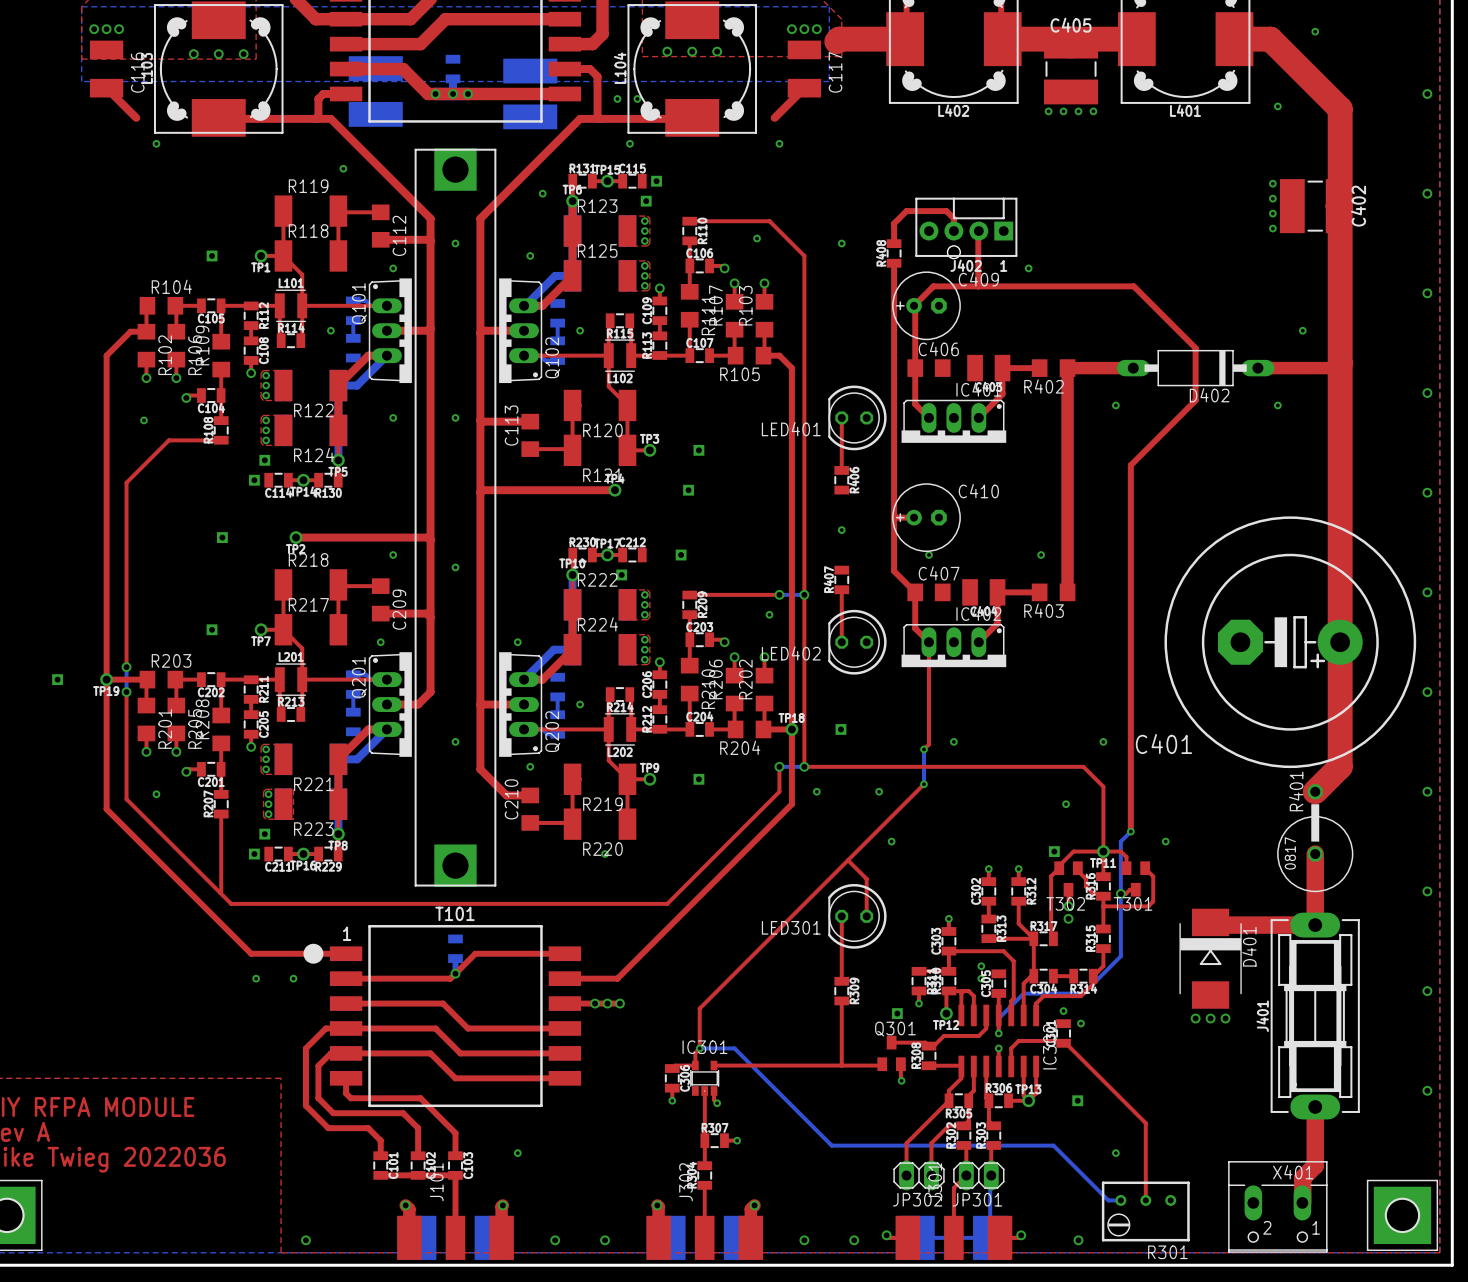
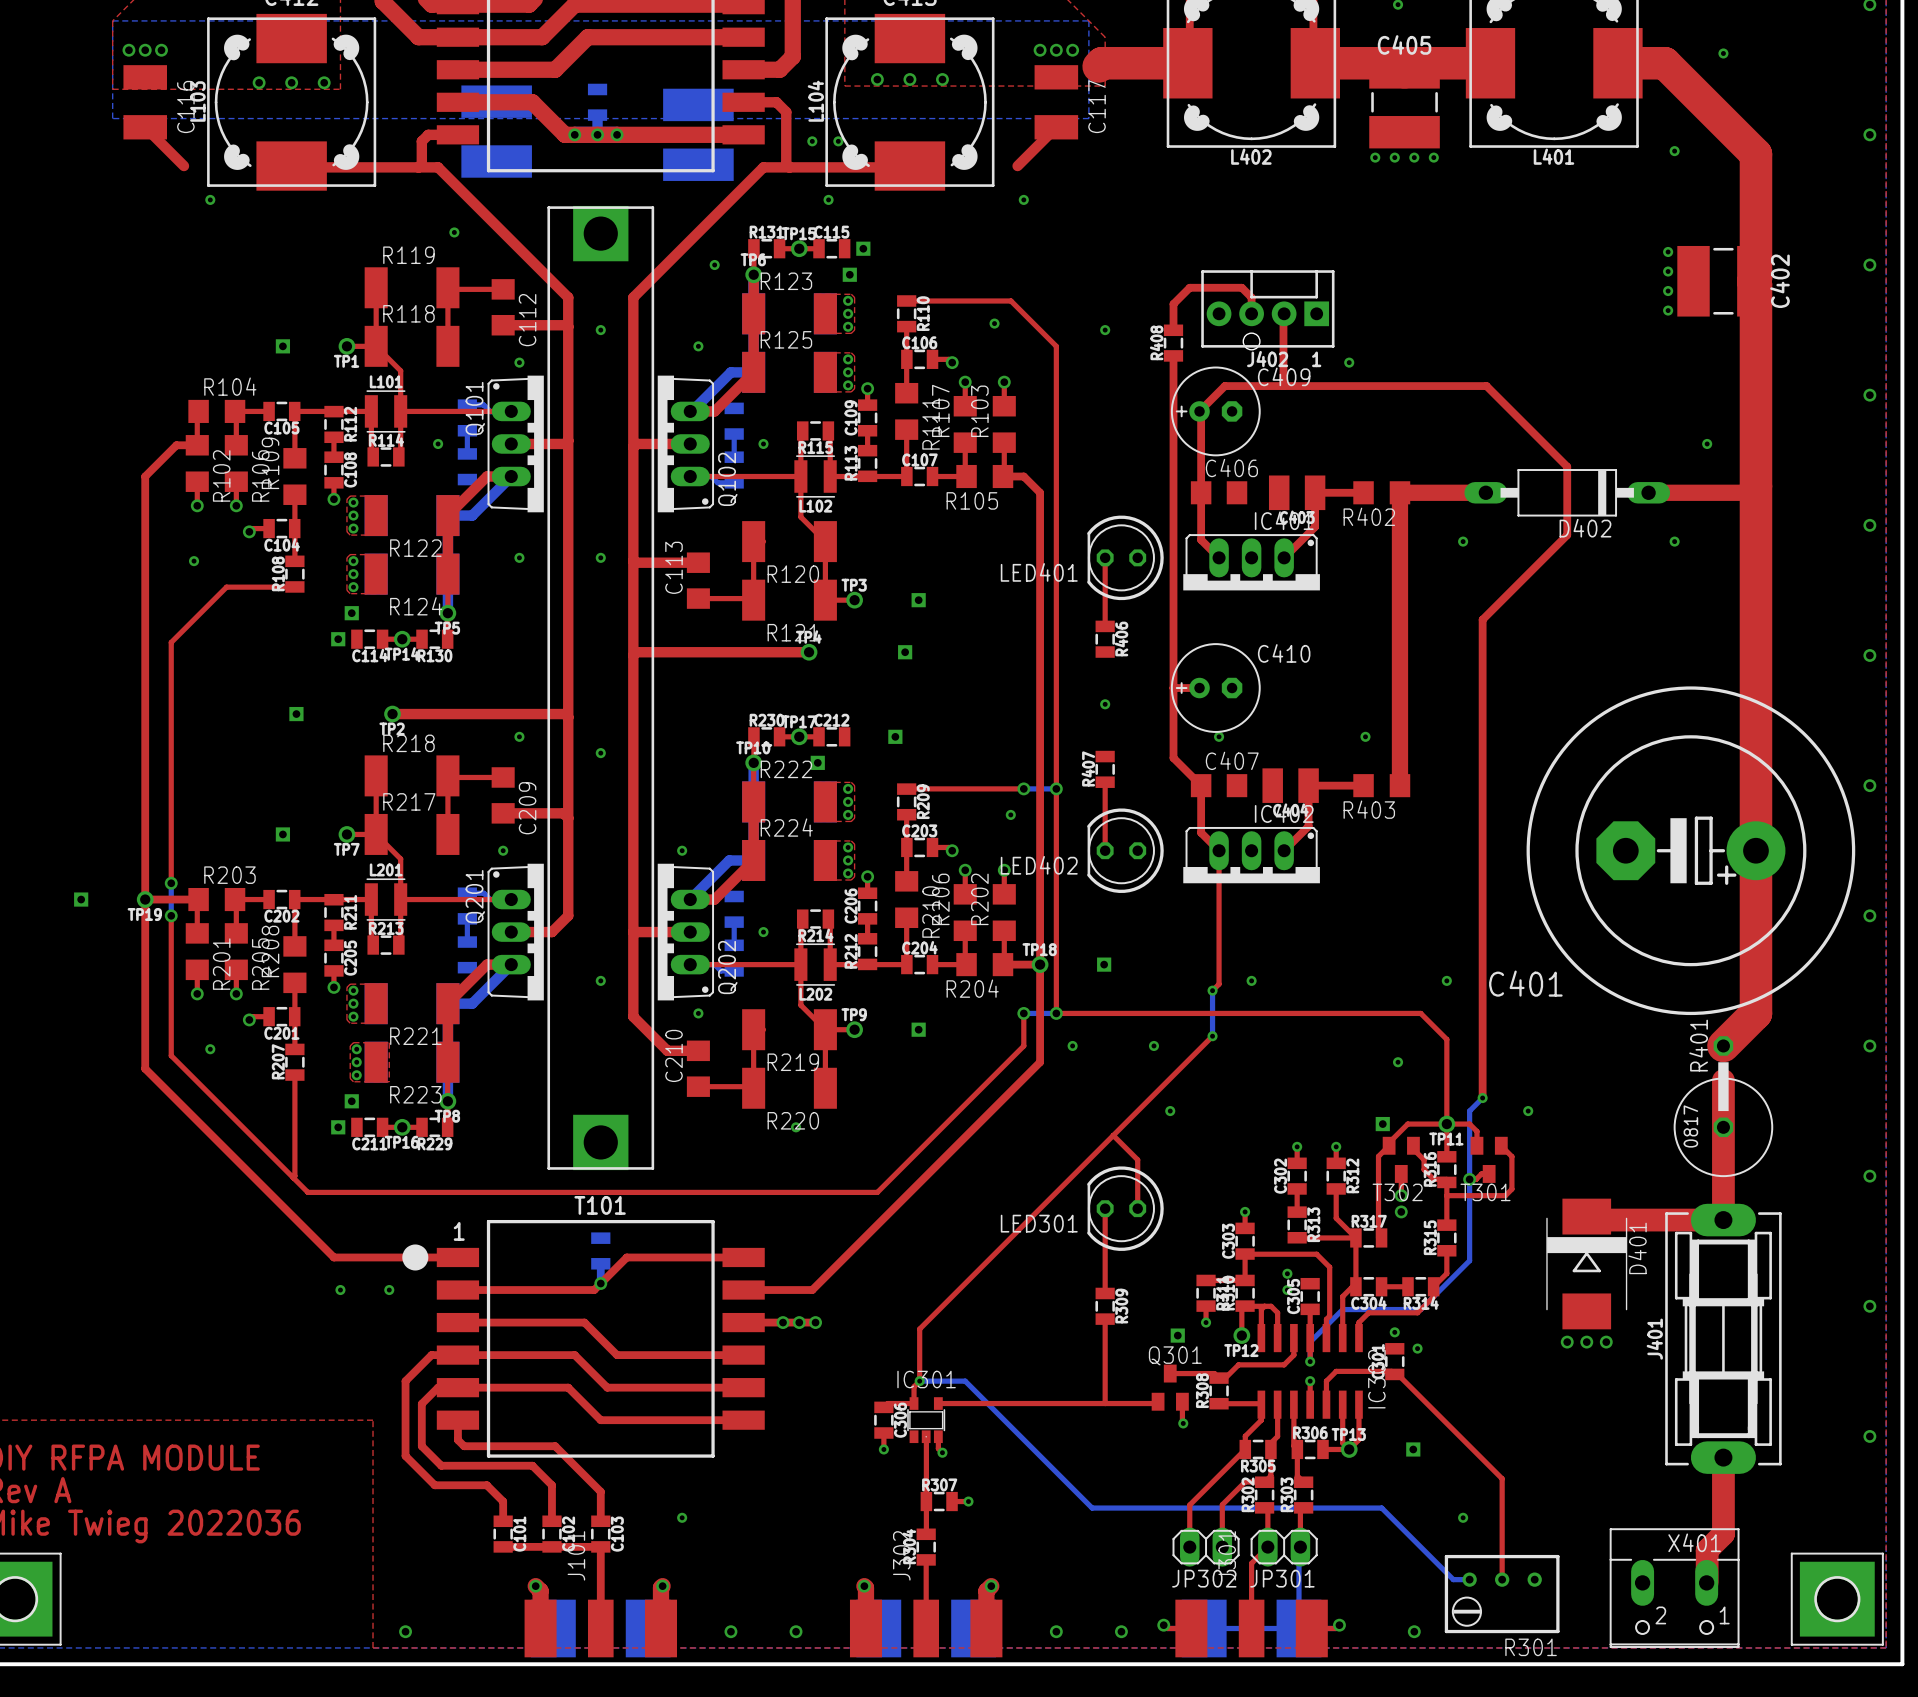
top track: none -> (1723, 1080) (1723, 1127)

